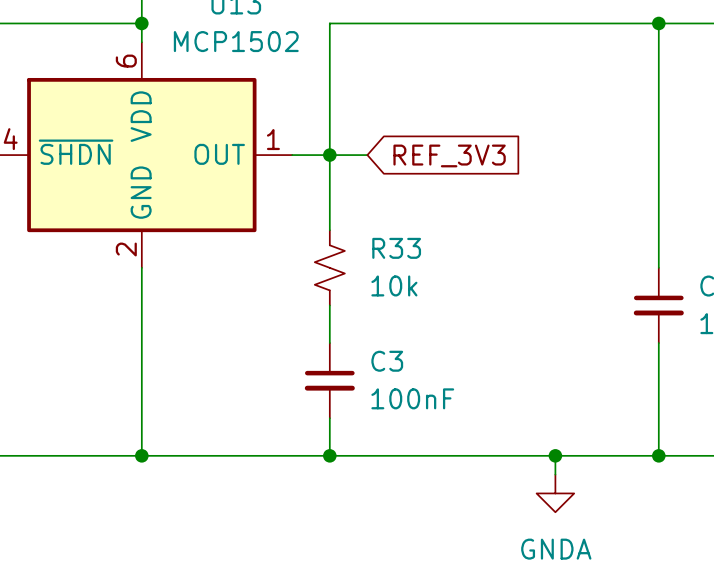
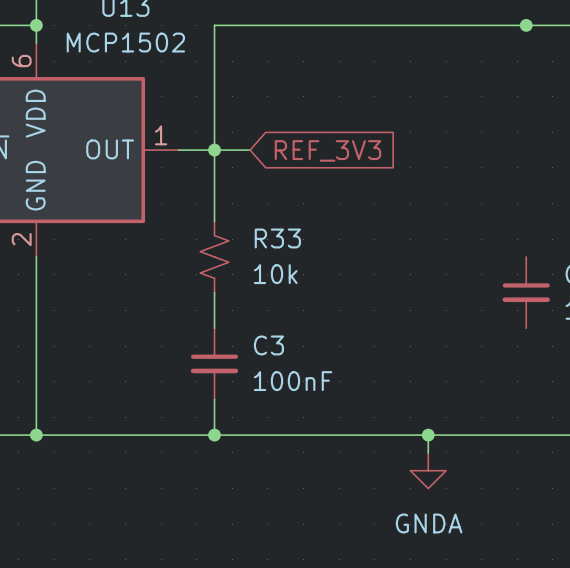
wire: (658, 23) (658, 267) -> none
wire: (658, 343) (658, 455) -> none
junction: (658, 455) -> none

